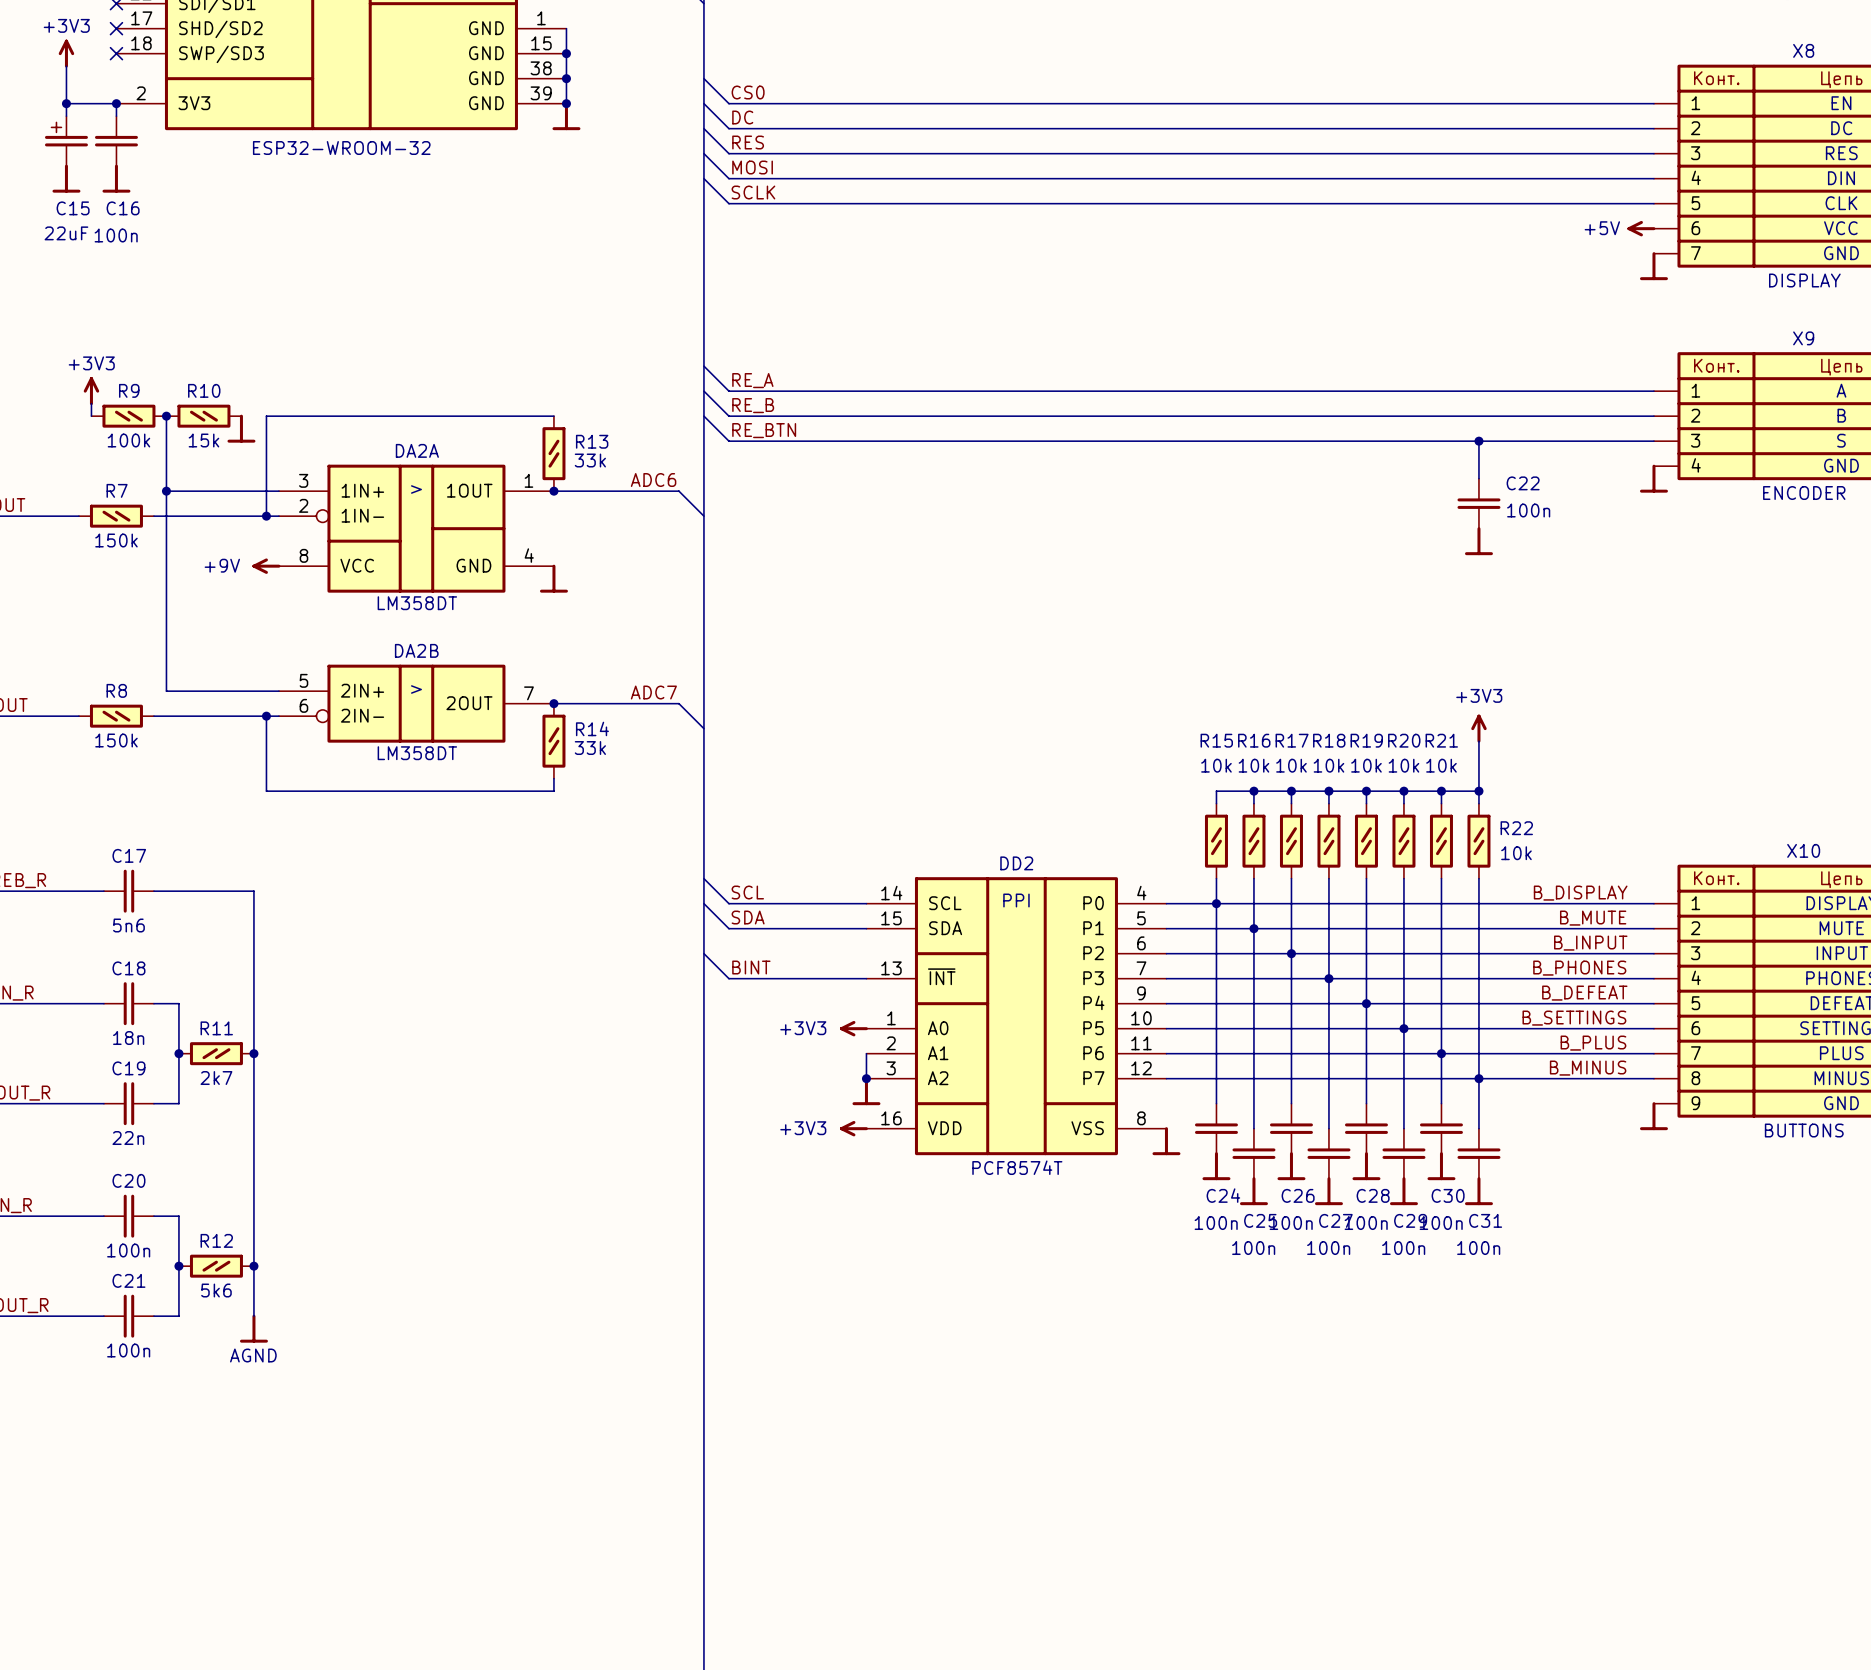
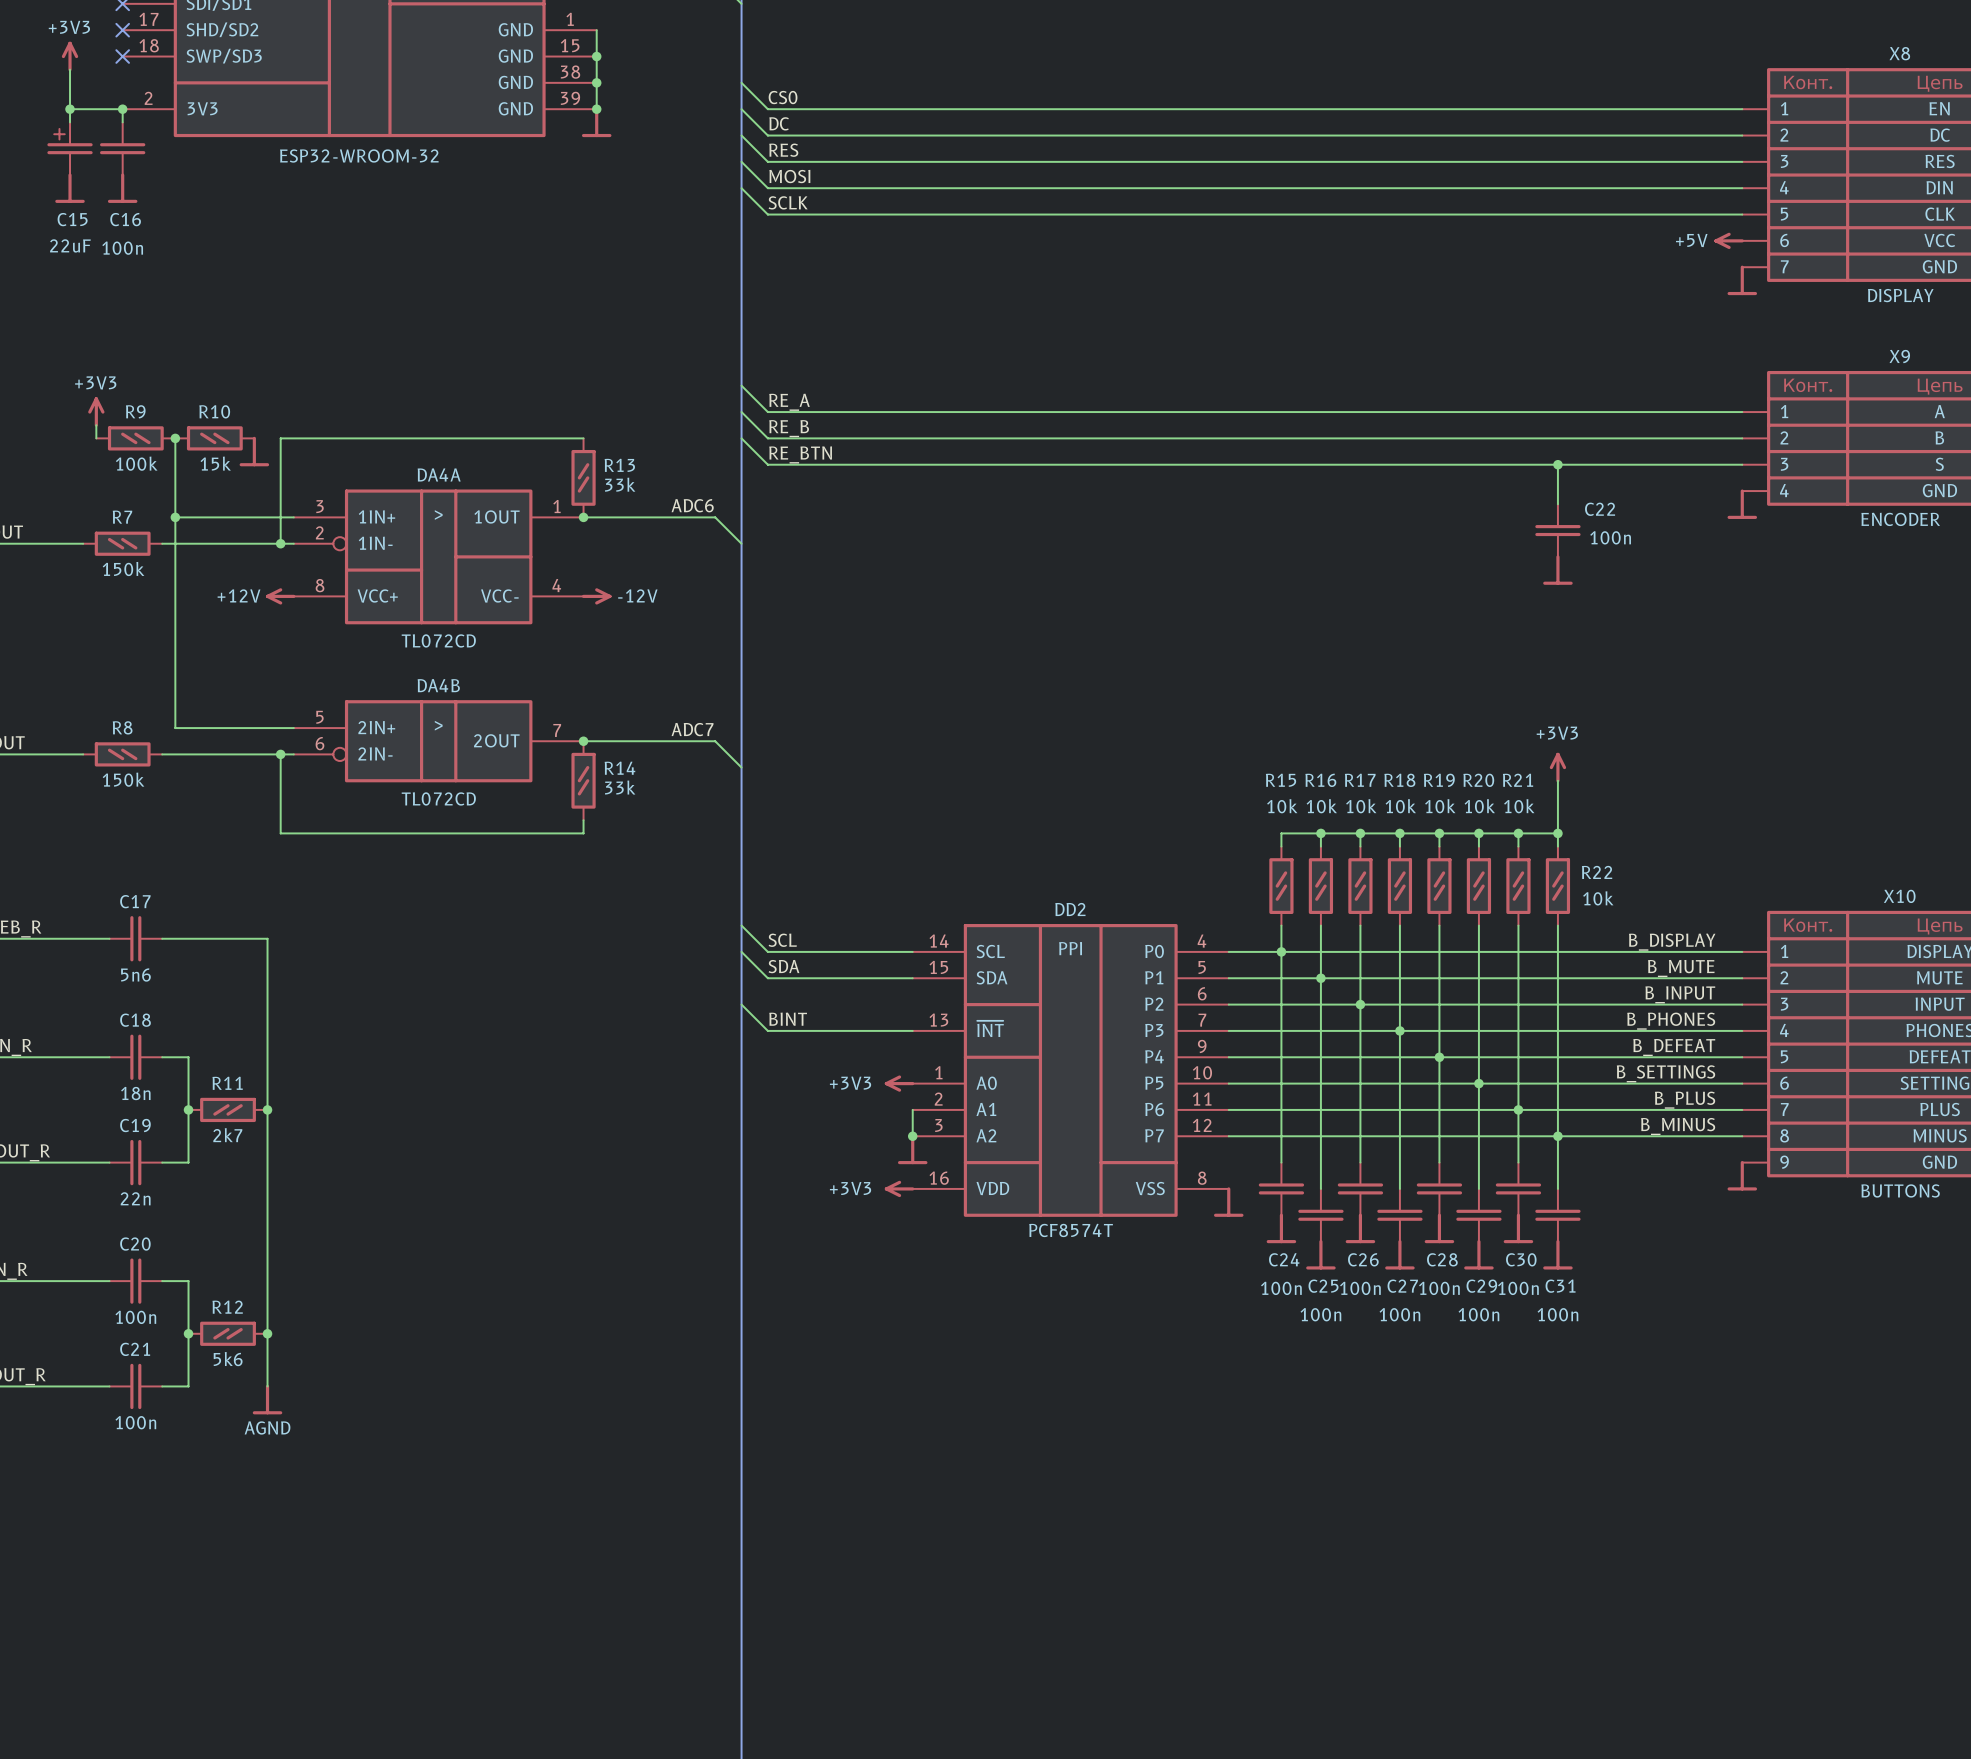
DA2A name: DA2A (417, 450) -> DA4A (439, 474)
DA2A pin name: VCC (357, 565) -> VCC+ (377, 595)
DA2A pin name: GND (473, 565) -> VCC- (499, 595)
power symbol: +9V (266, 566) -> +12V (280, 596)
power symbol: none -> -12V (596, 596)
power symbol: (553, 578) -> none
DA2A value: LM358DT (417, 603) -> TL072CD (438, 640)
DA2B name: DA2B (416, 650) -> DA4B (438, 685)
DA2B value: LM358DT (417, 753) -> TL072CD (438, 798)

